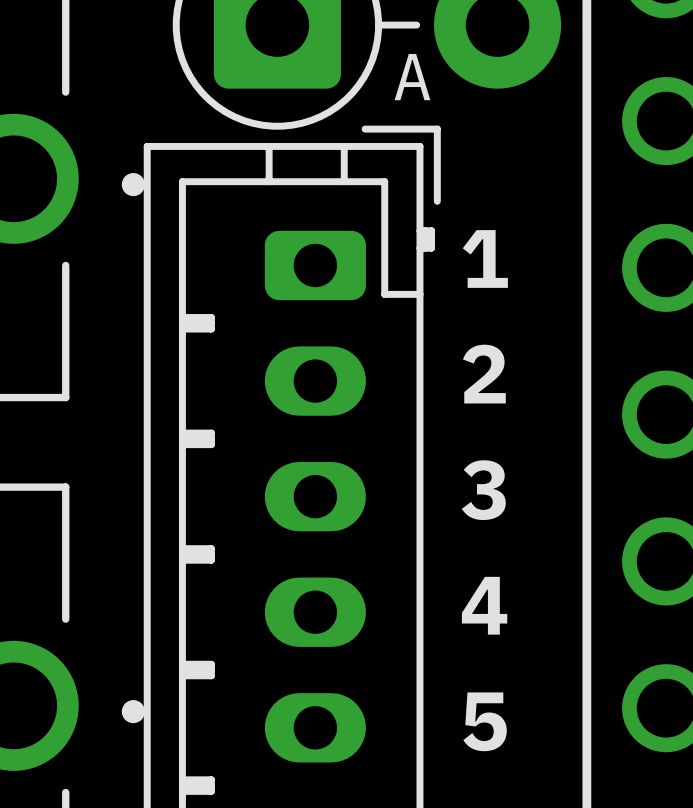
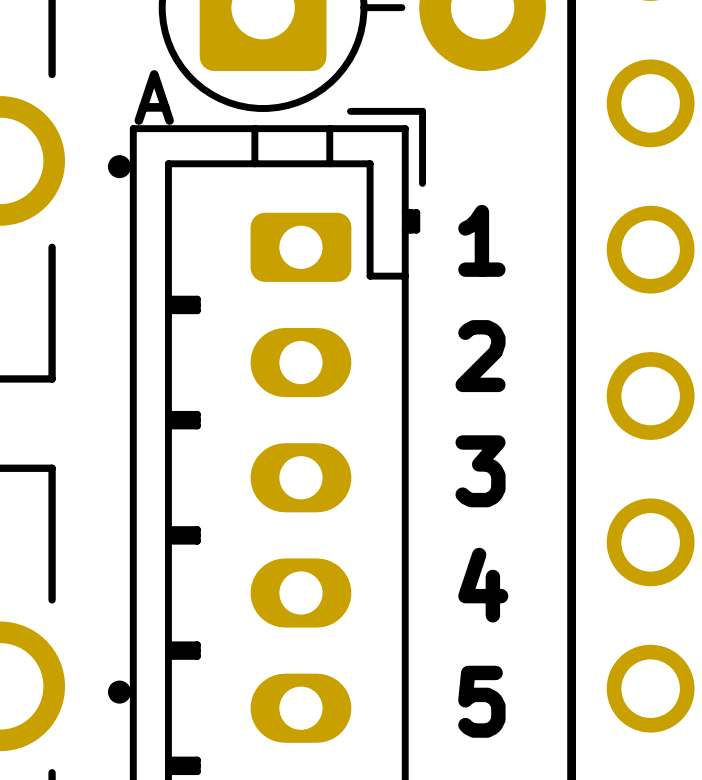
part text position: A (412, 77) -> A (154, 97)

